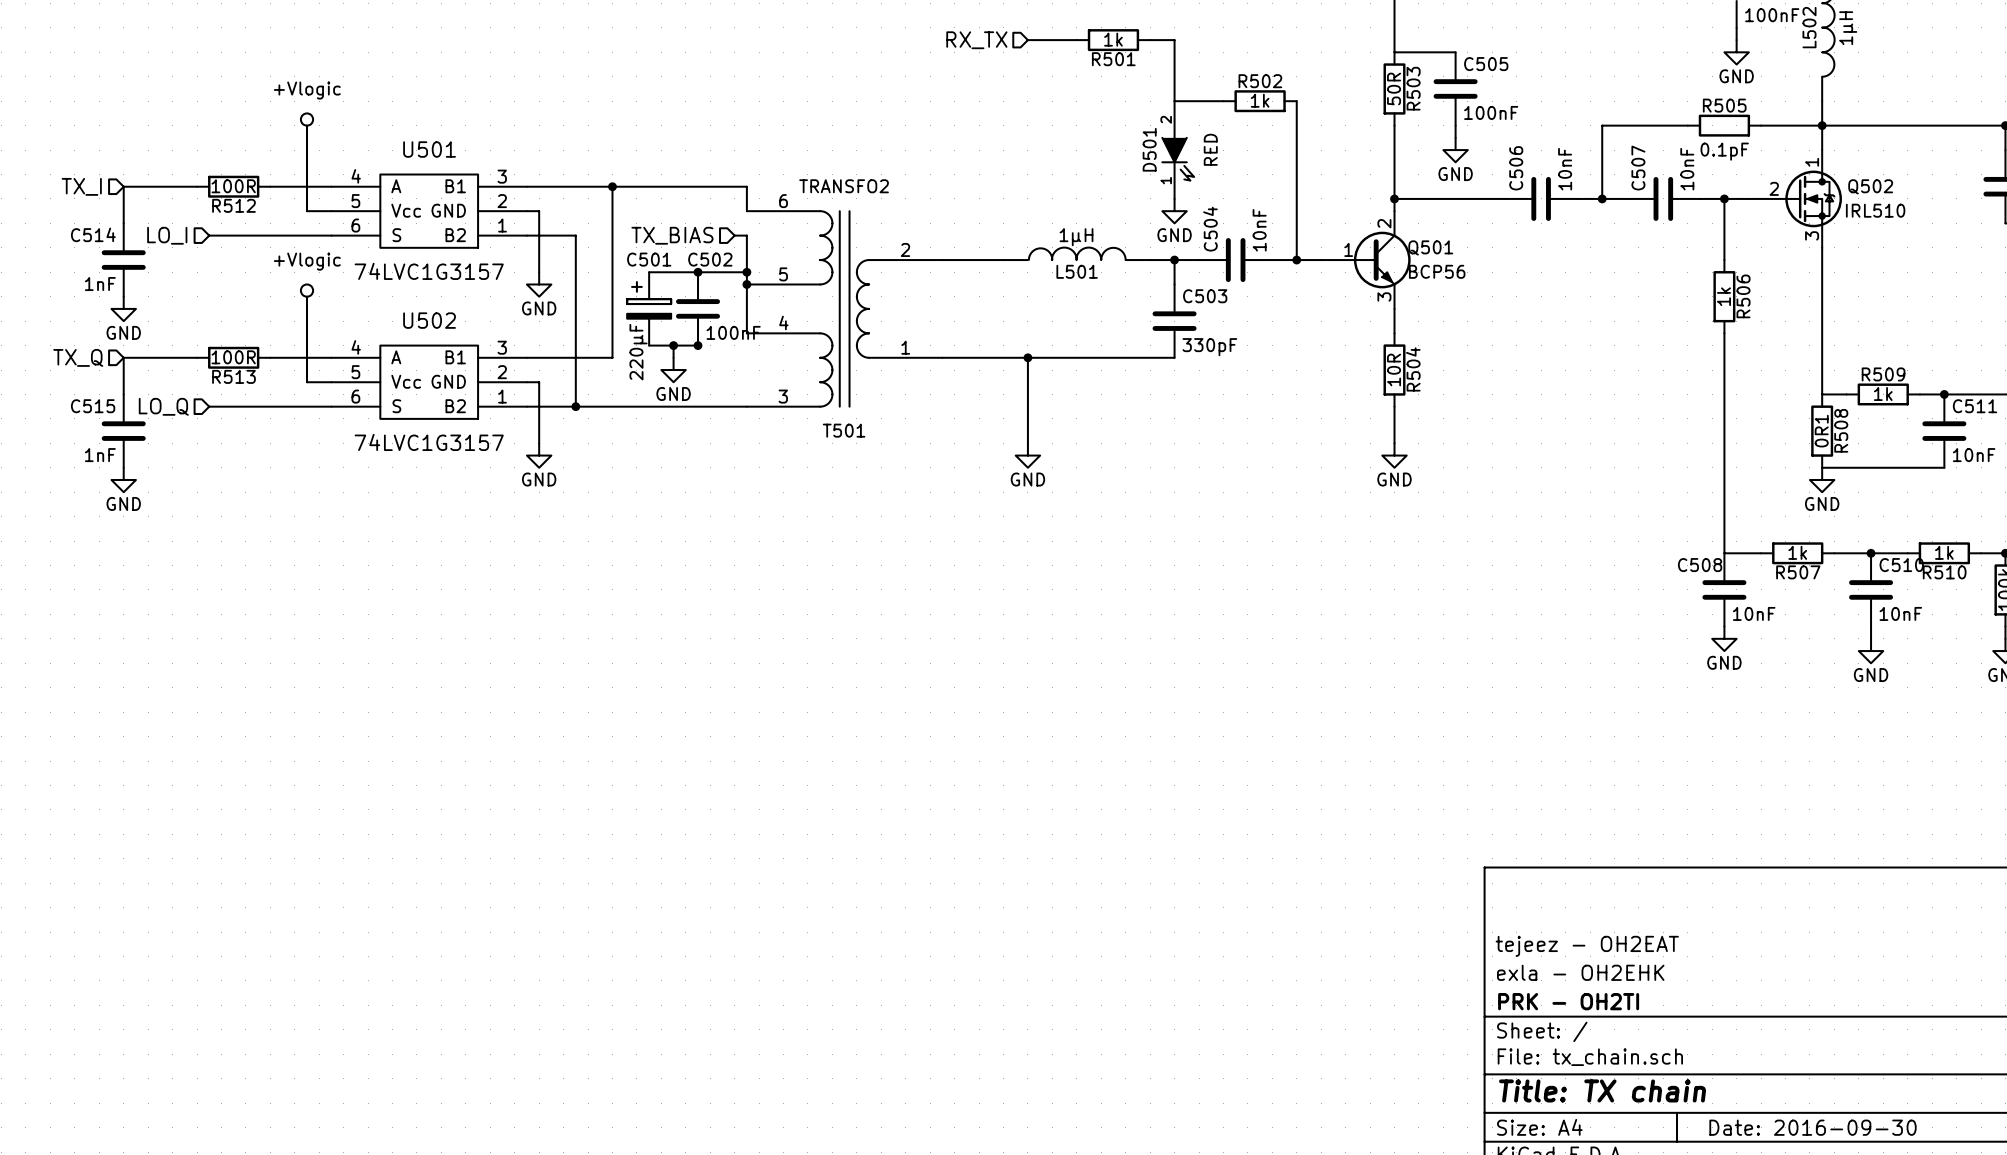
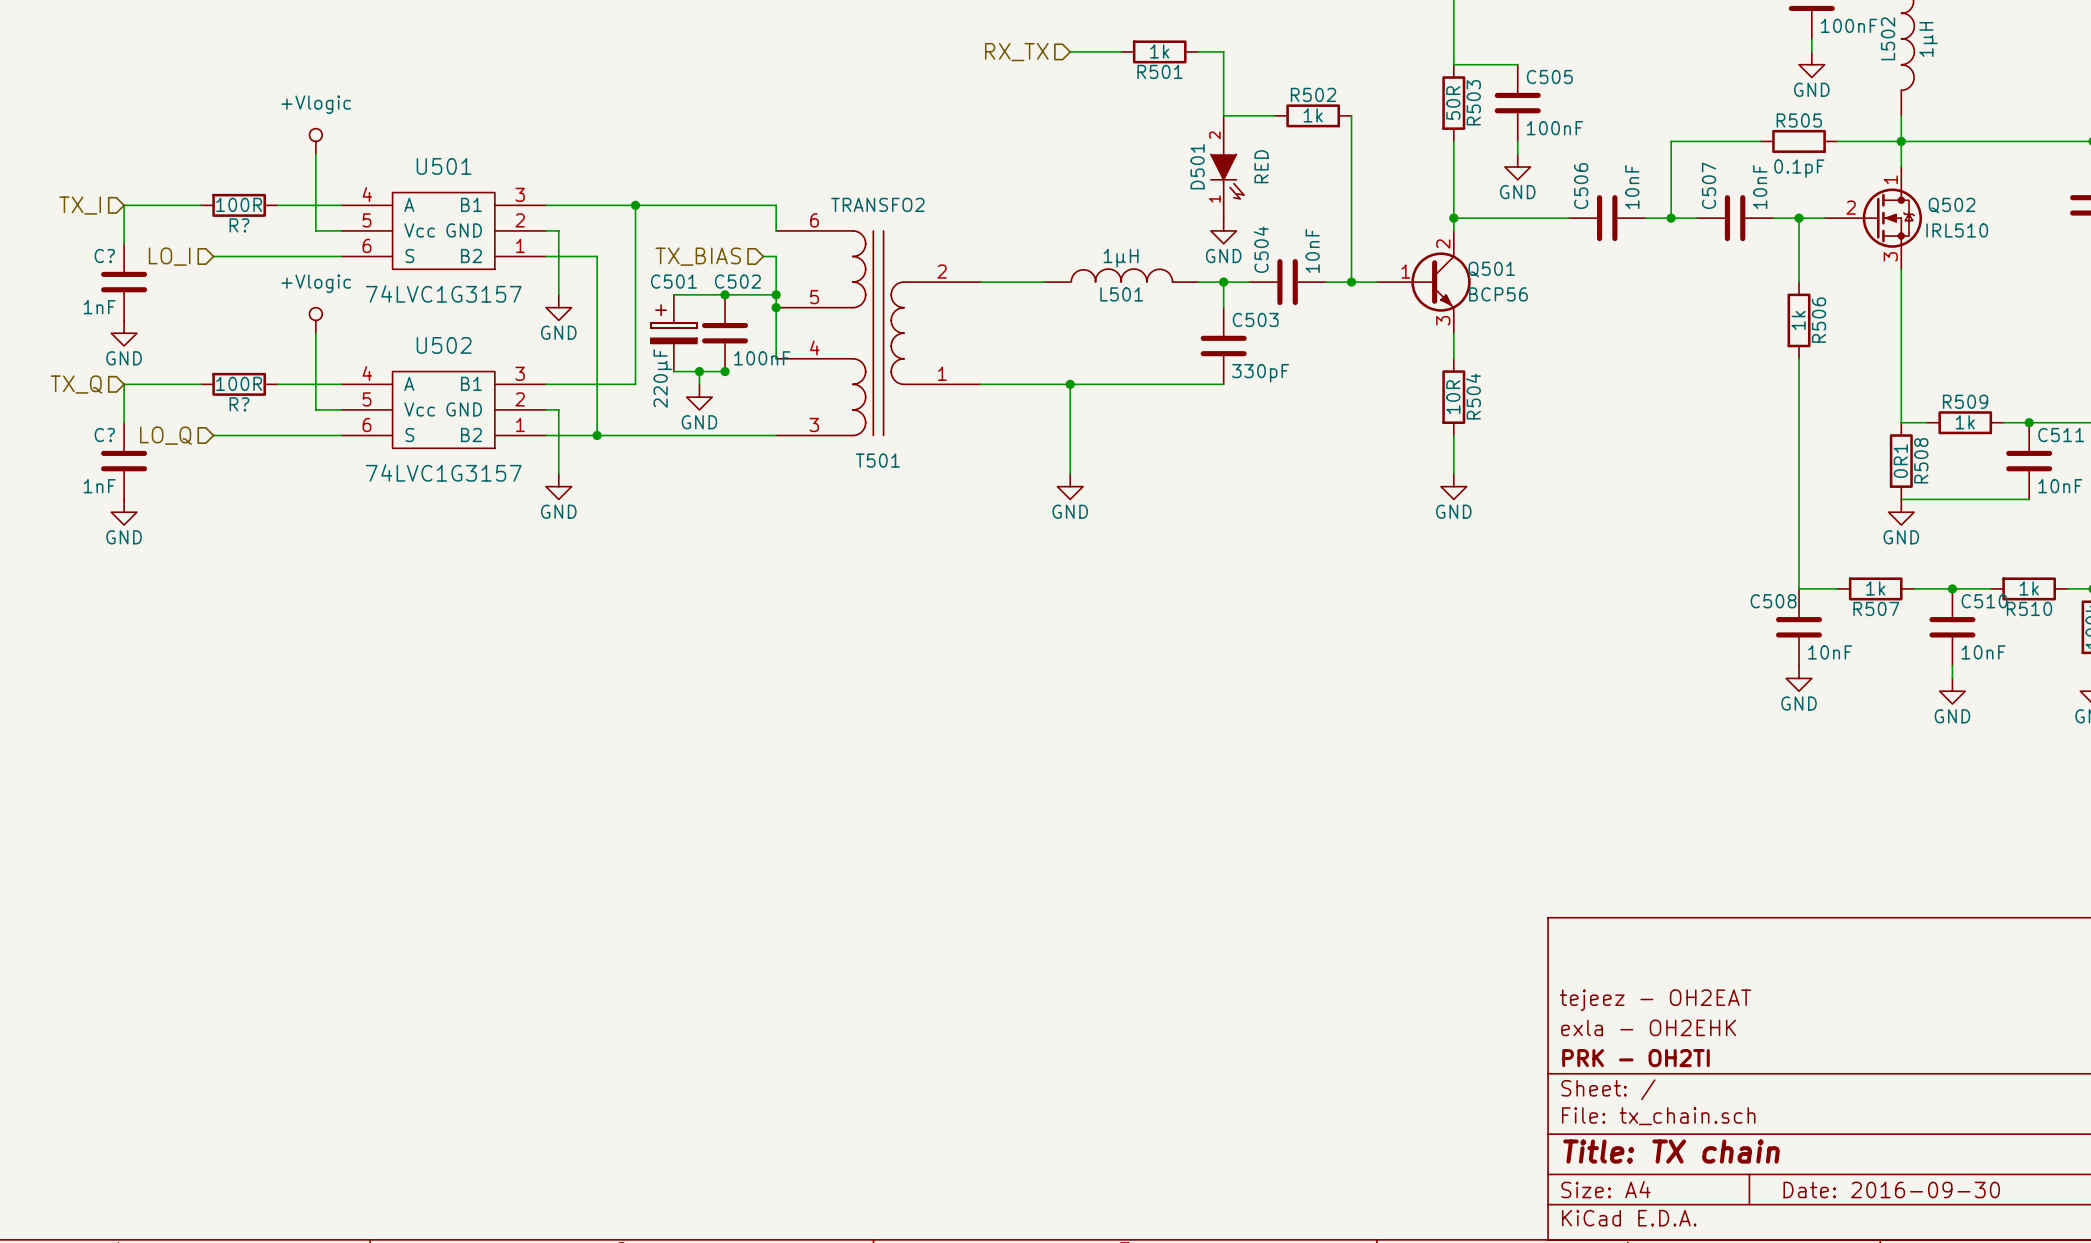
R512 name: R512 (233, 205) -> R? (239, 225)
C514 name: C514 (93, 234) -> C? (104, 256)
R513 name: R513 (233, 376) -> R? (239, 404)
C515 name: C515 (93, 406) -> C? (104, 435)

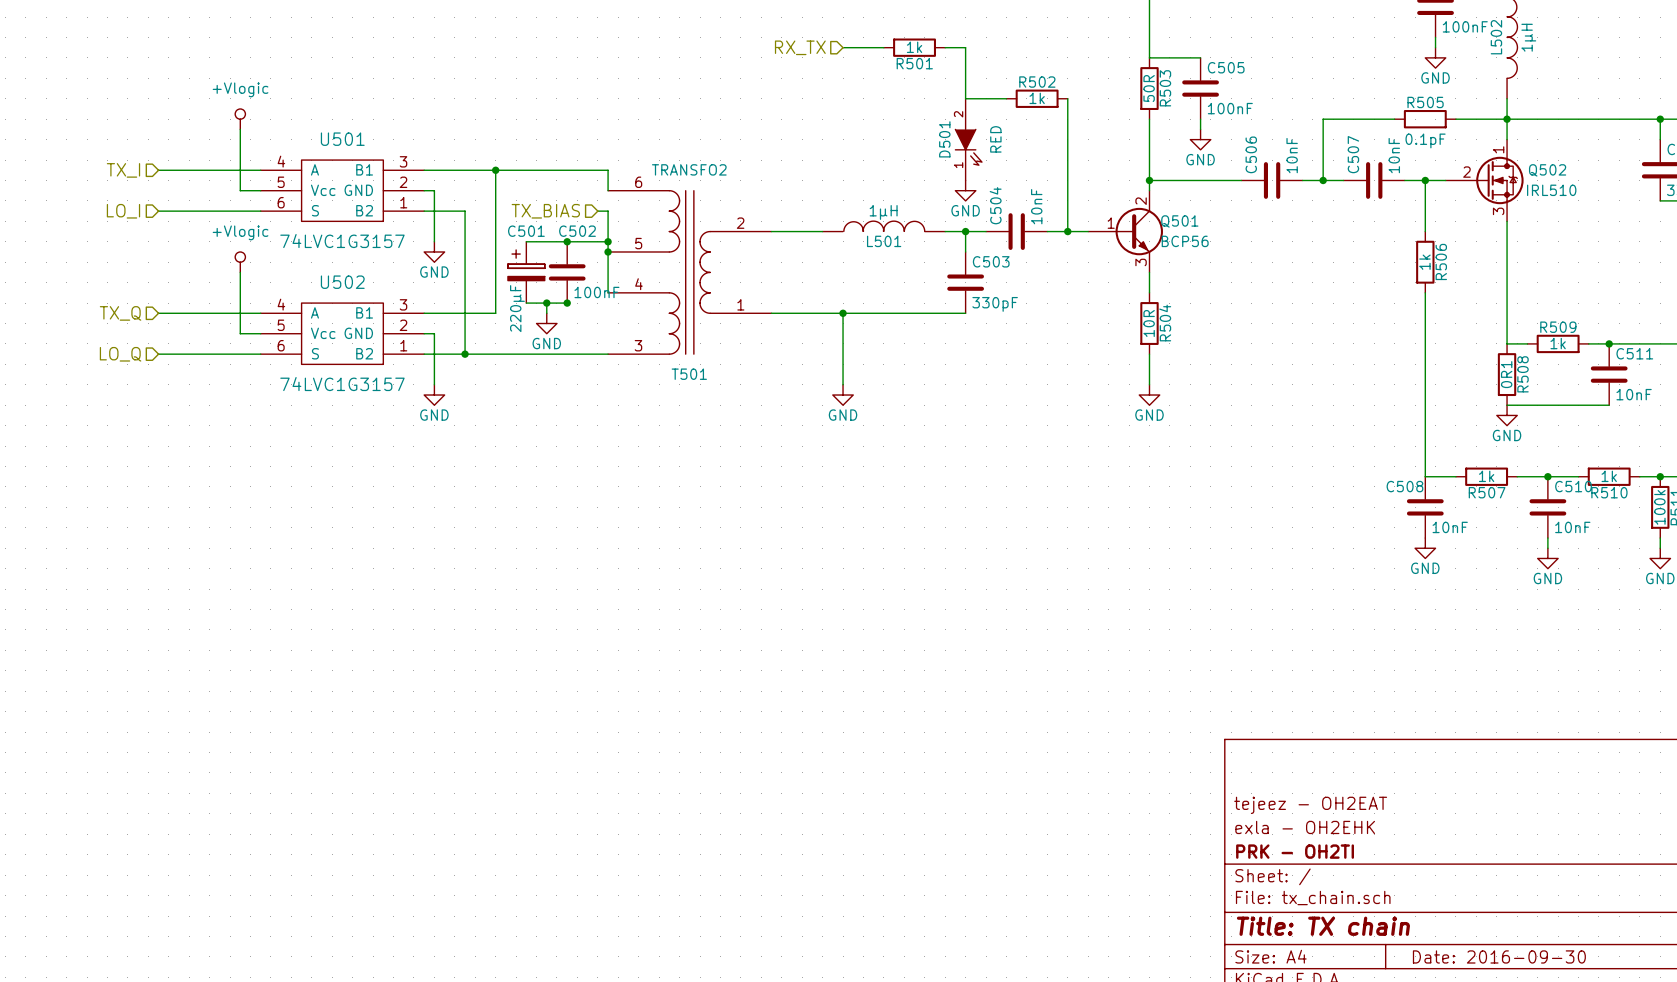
hierarchical label position: TX_I (80, 205) -> TX_I (123, 170)
wire: (200, 205) (124, 205) (124, 243) -> none
wire: none -> (158, 170) (209, 170)
R?: 100R (239, 205) -> none
C?: 1nF (124, 282) -> none
power symbol: GND (124, 333) -> none
hierarchical label position: TX_Q (76, 384) -> TX_Q (120, 313)
wire: (200, 384) (124, 384) (124, 422) -> none
wire: none -> (158, 313) (209, 313)
R?: 100R (239, 384) -> none
C?: 1nF (124, 461) -> none
power symbol: GND (124, 512) -> none

